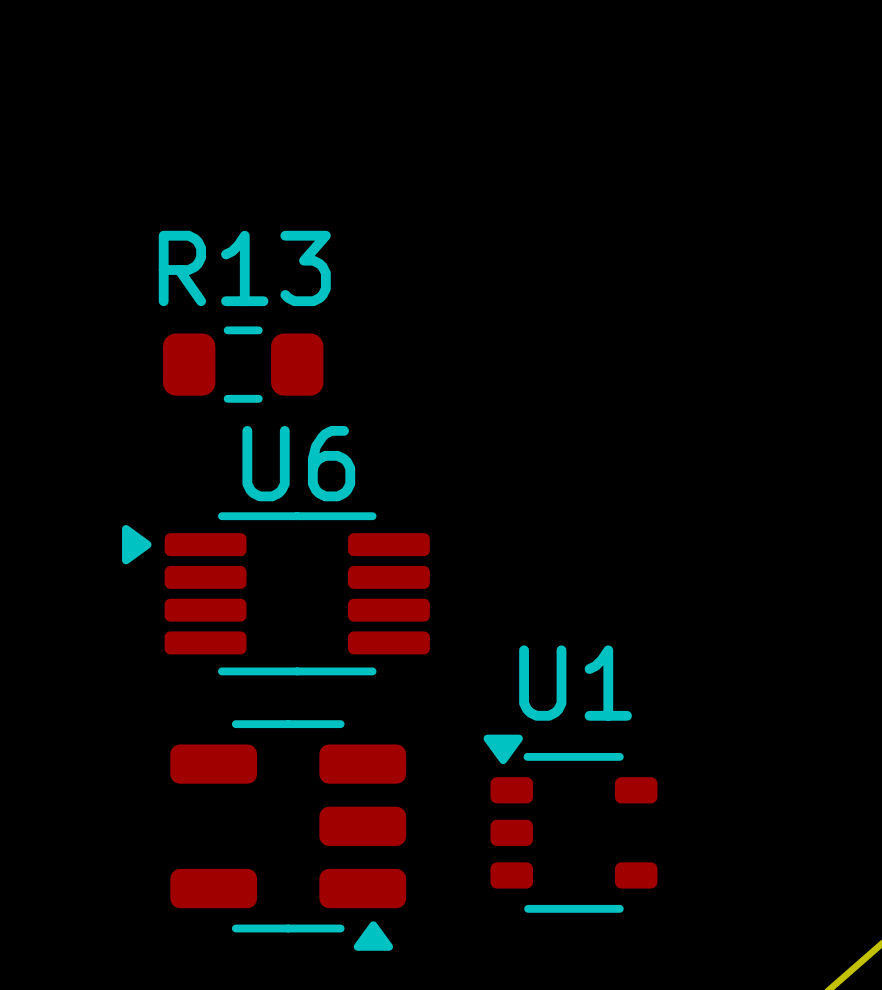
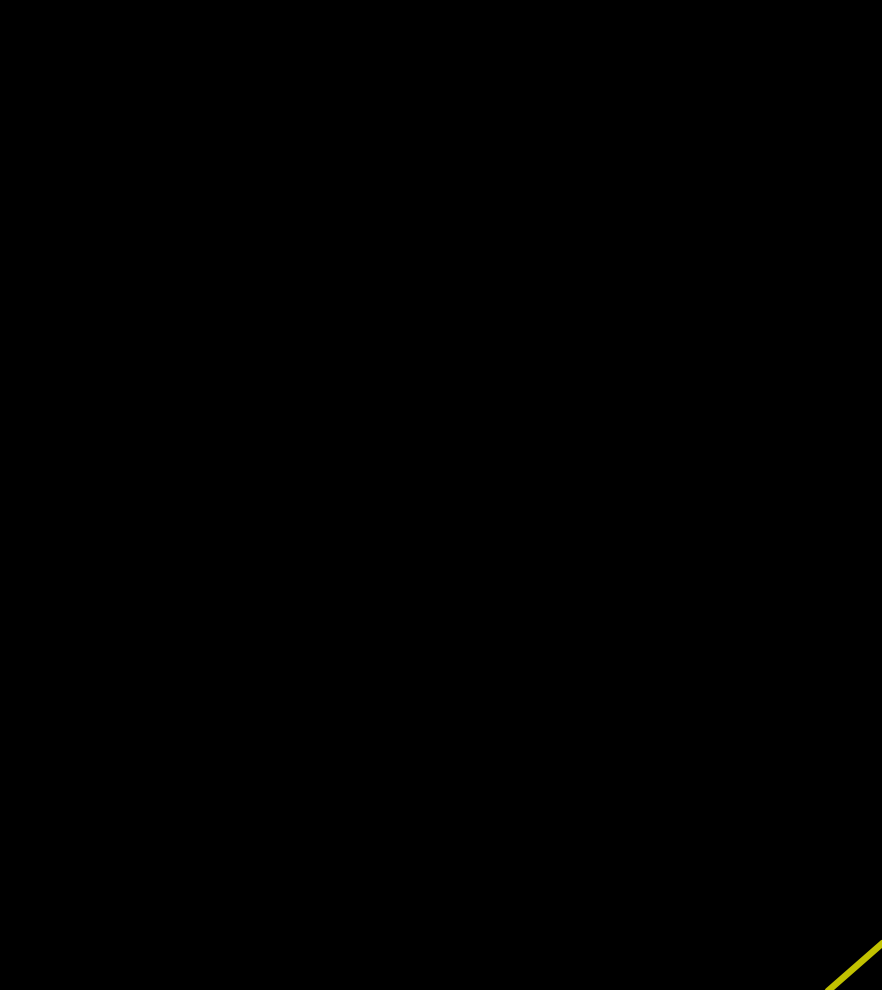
R13: (243, 364) -> none
U6: (275, 593) -> none
U1: (570, 823) -> none
part: (288, 835) -> none

